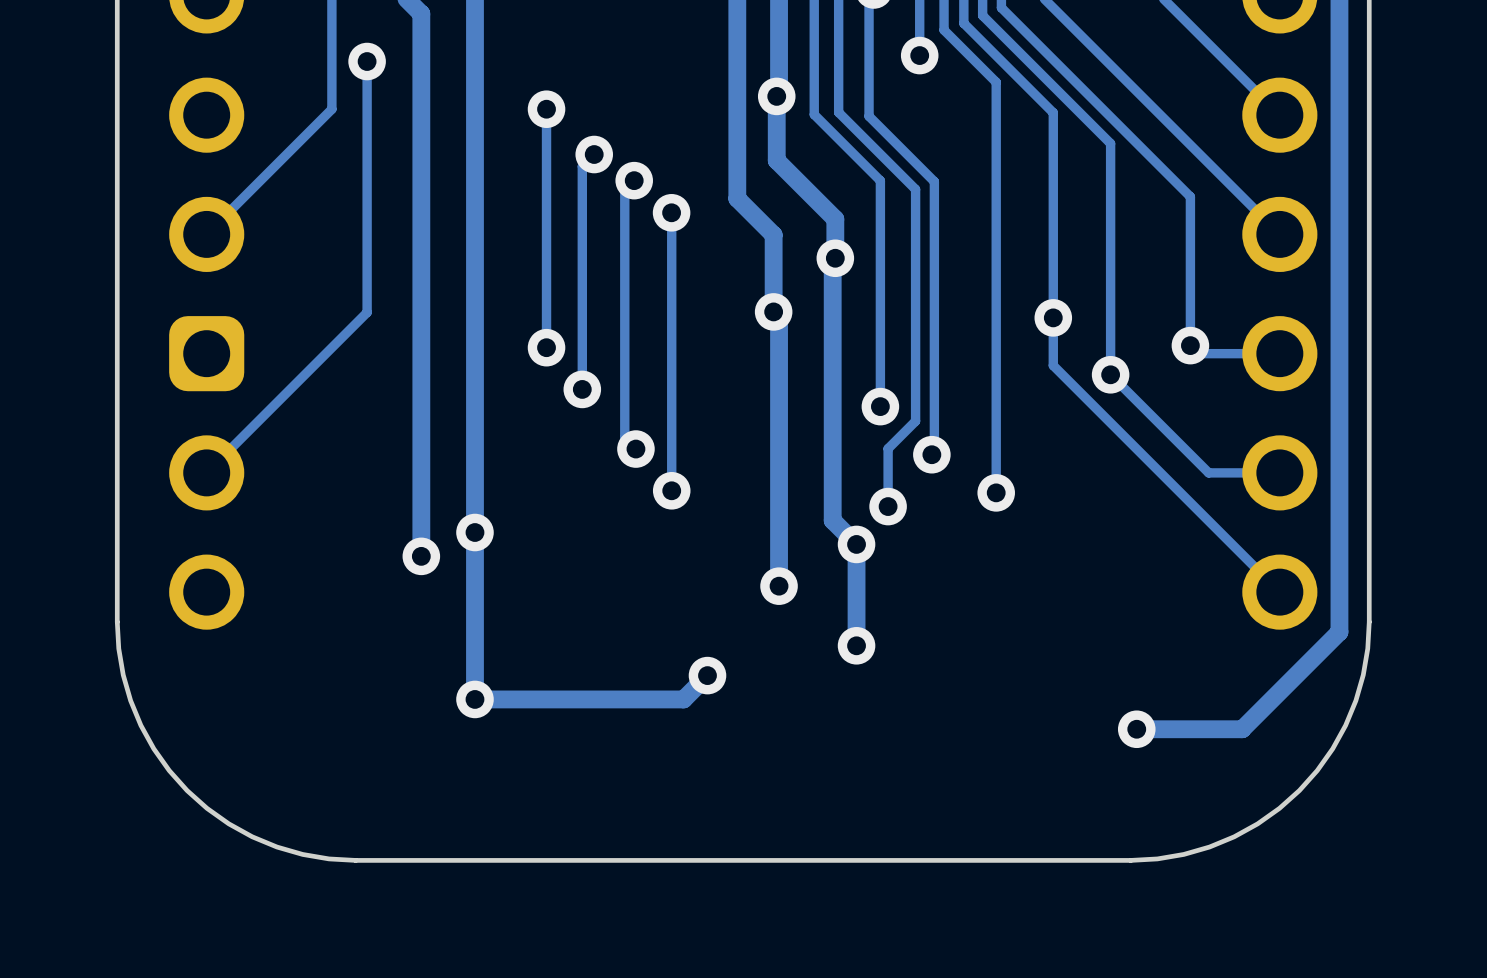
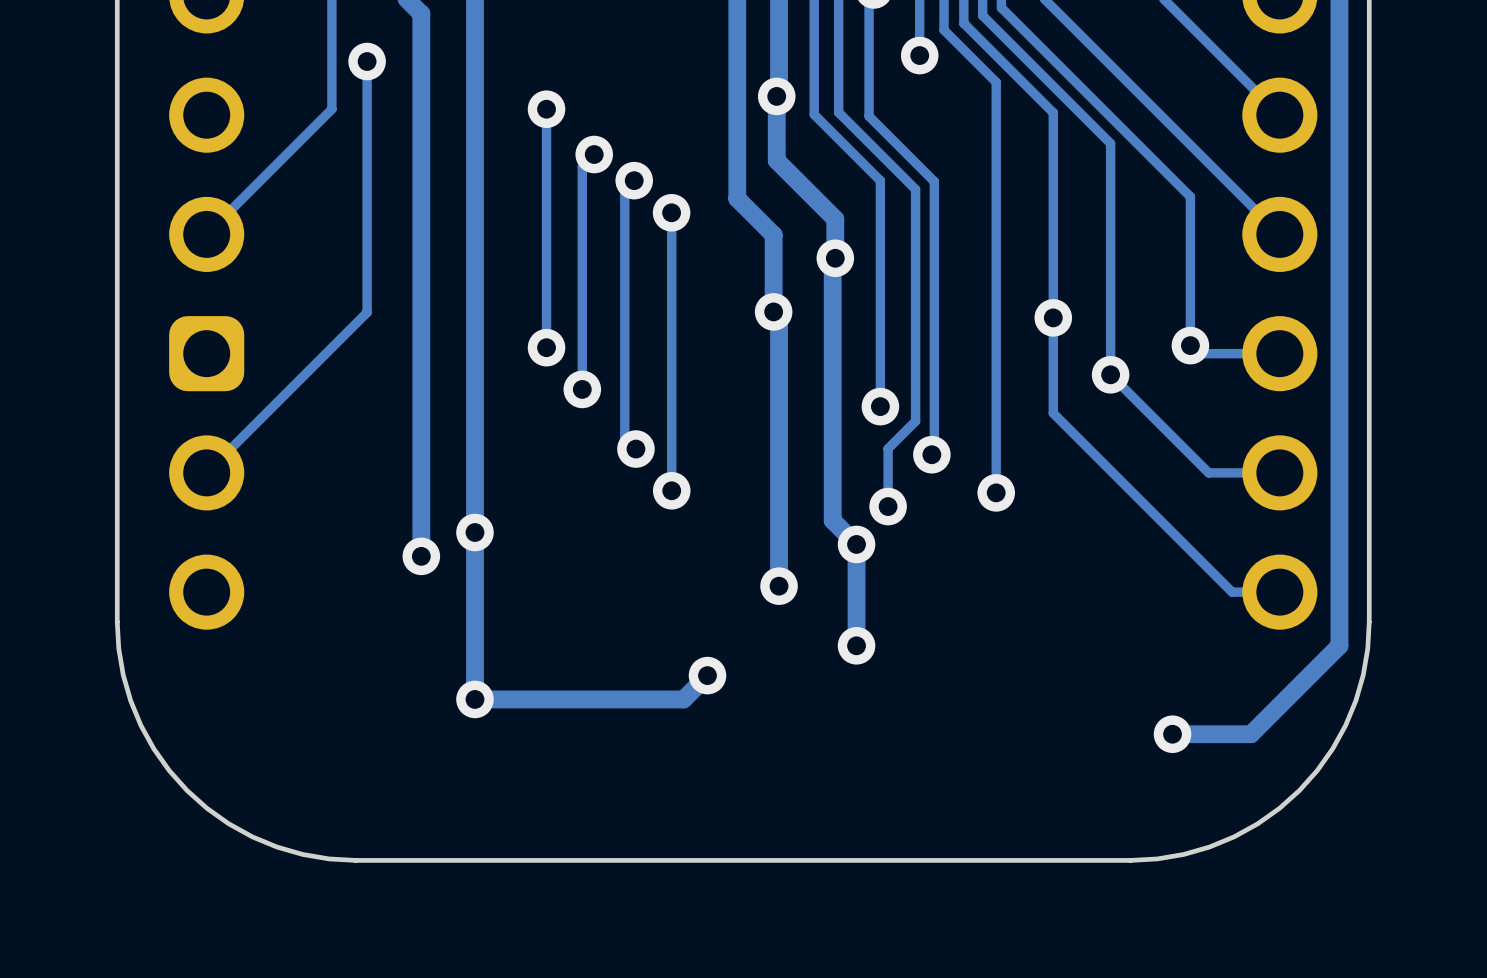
track: (1053, 365) (1279, 592) -> (1053, 365) (1053, 413) (1232, 592) (1279, 592)
track: (1339, 632) (1242, 729) (1136, 729) -> (1339, 632) (1339, 645) (1251, 734) (1172, 734)
via position: (1136, 729) -> (1172, 734)

